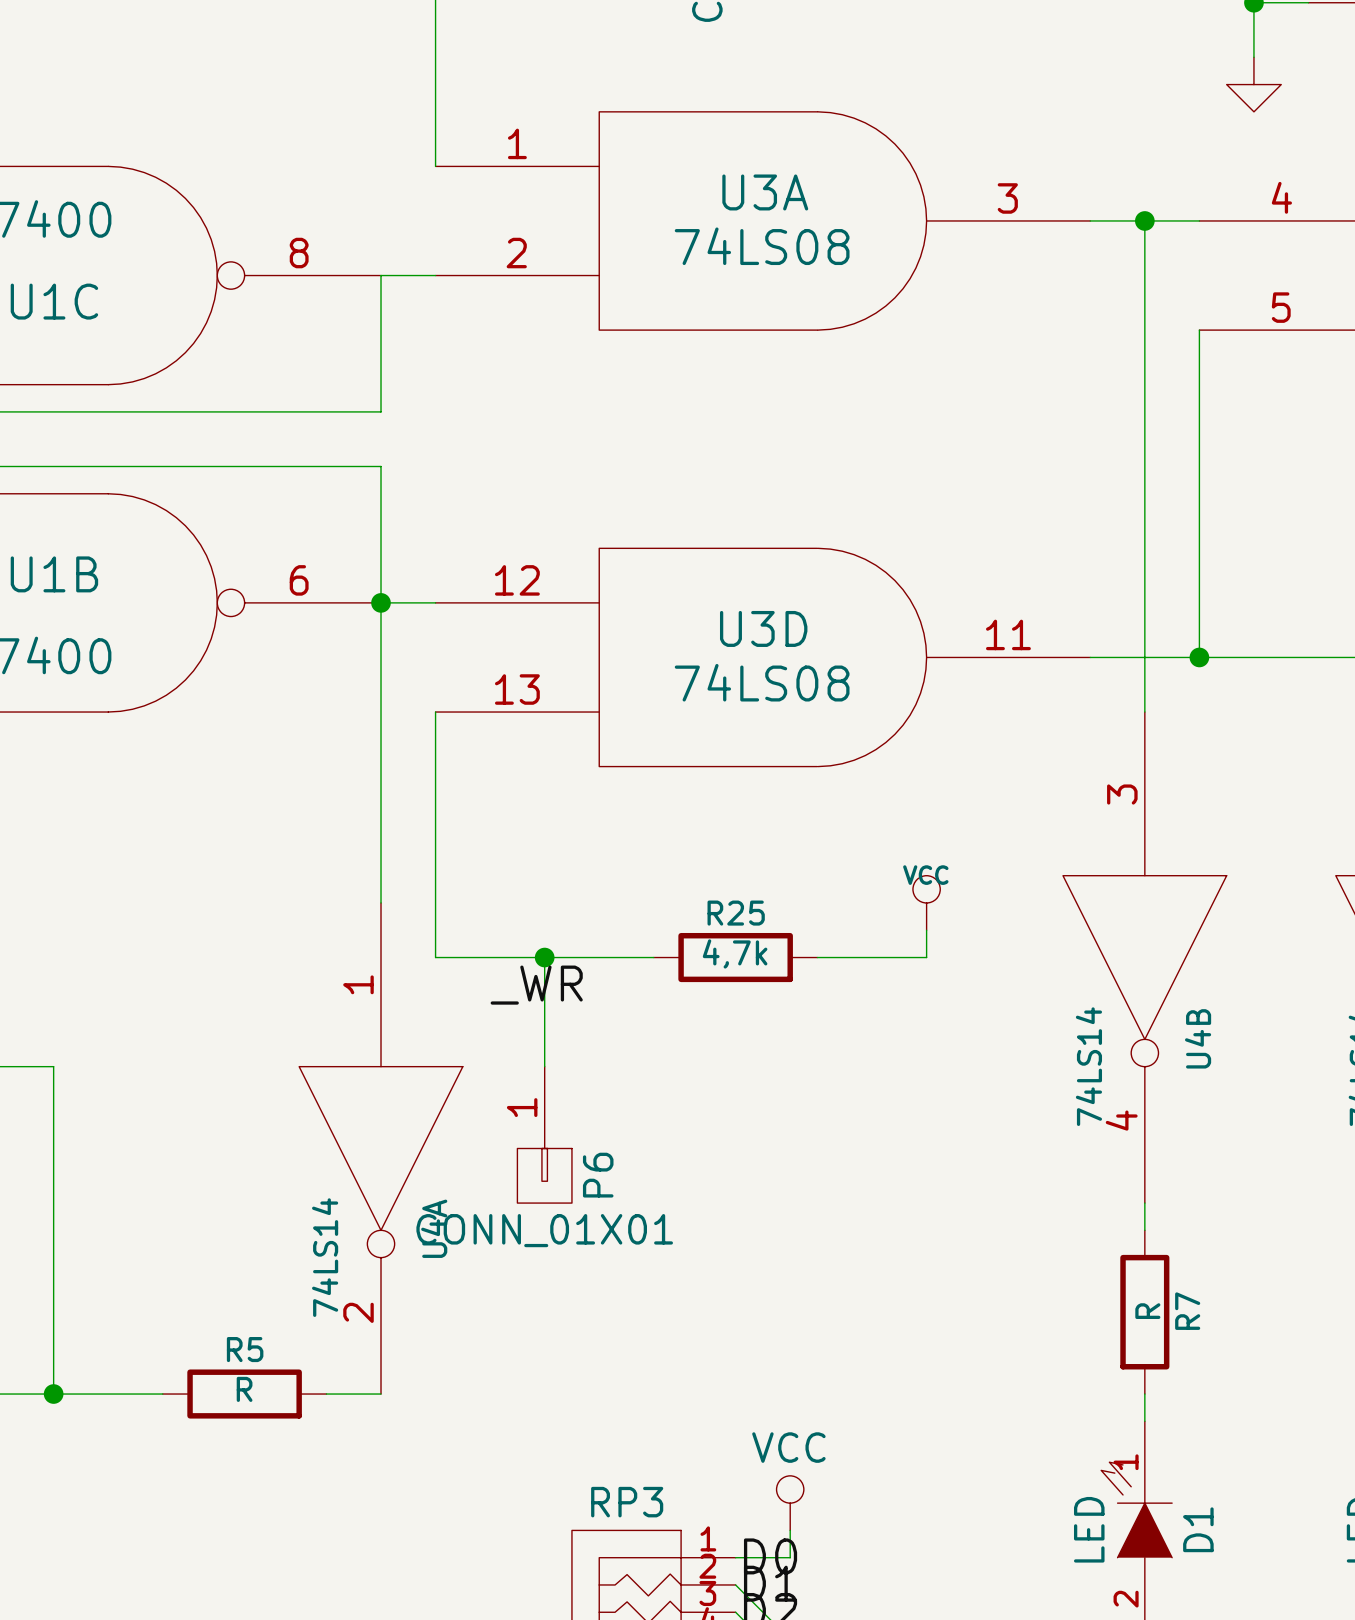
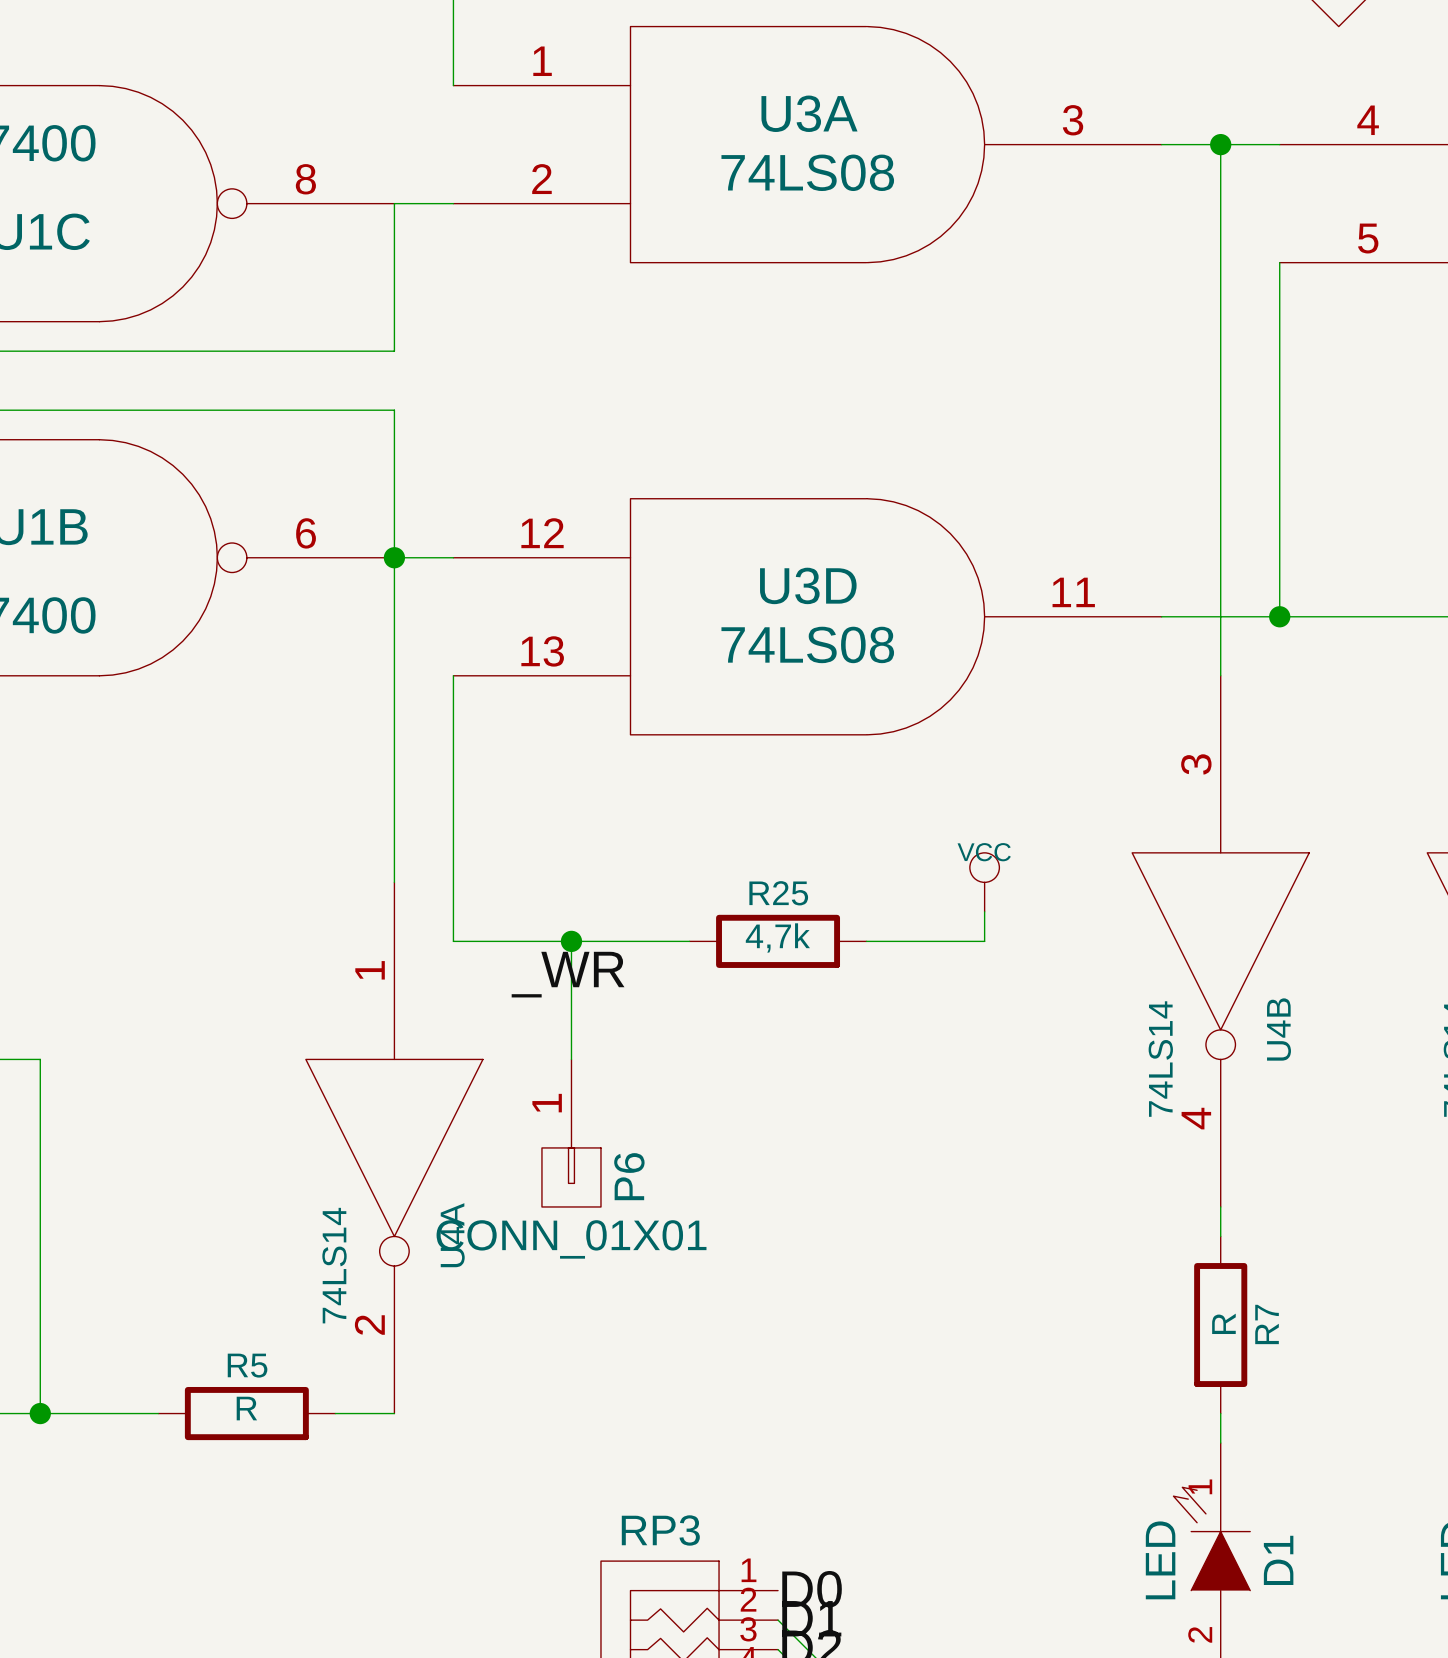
power symbol: VCC (790, 1503) -> none
wire: (790, 1530) (790, 1557) (735, 1557) -> none

